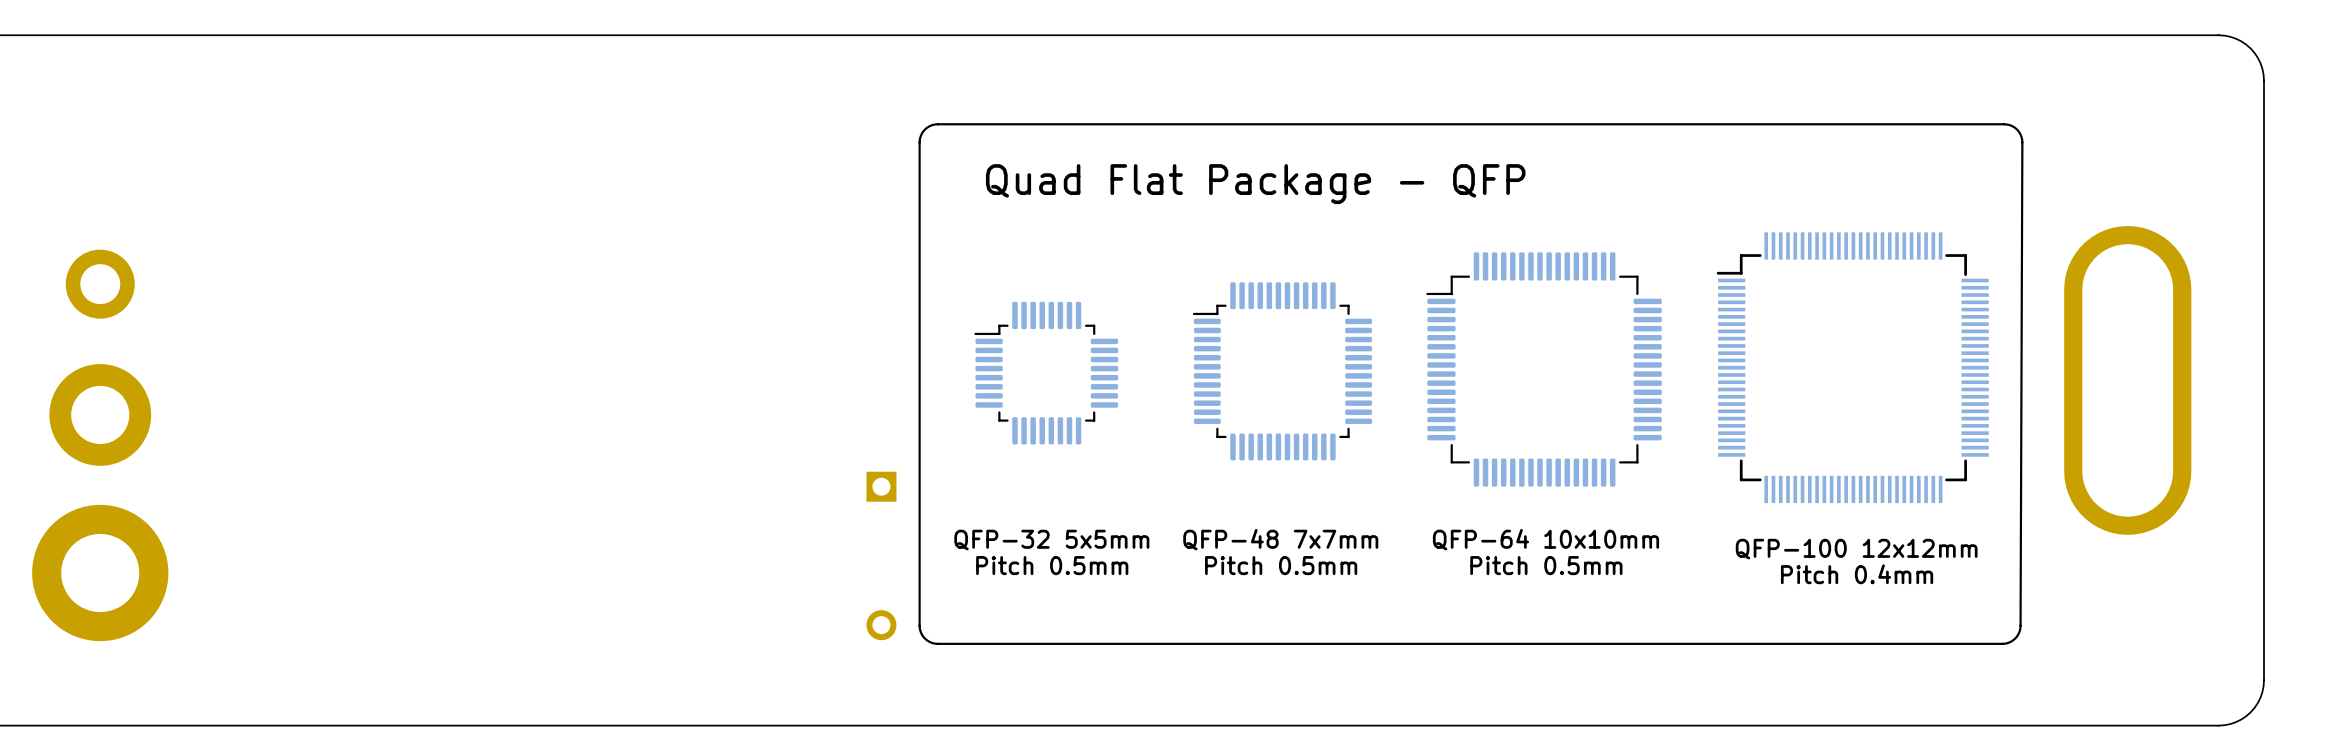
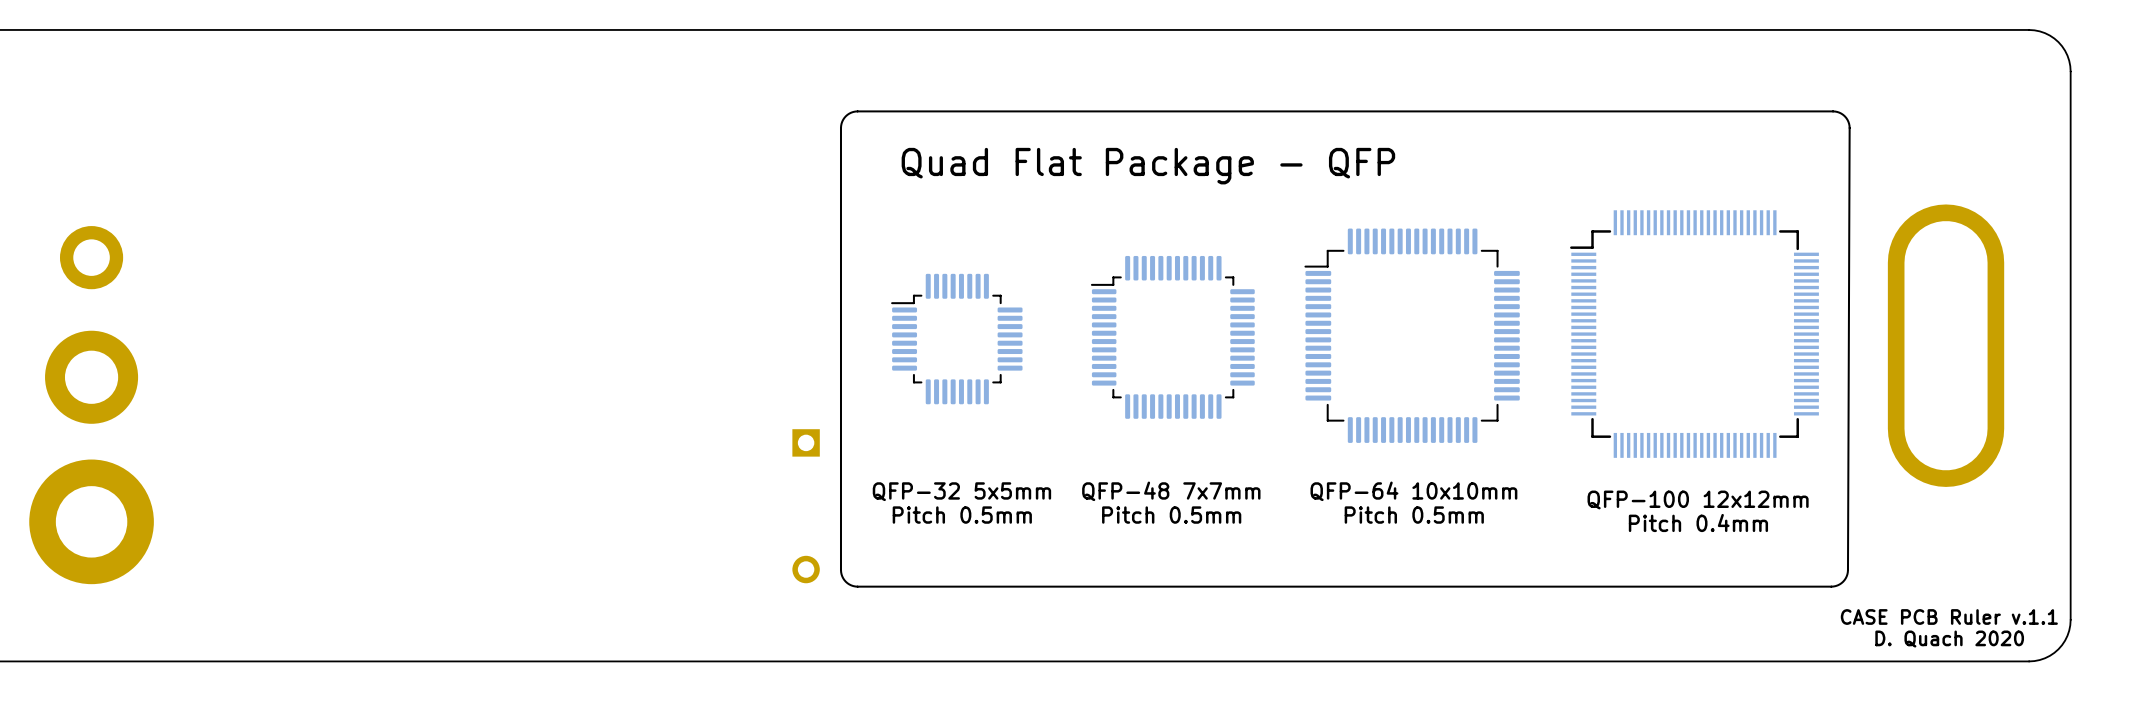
text: none -> CASE PCB Ruler v.1.1 (1949, 616)
text: none -> D. Quach 2020 (1949, 639)

